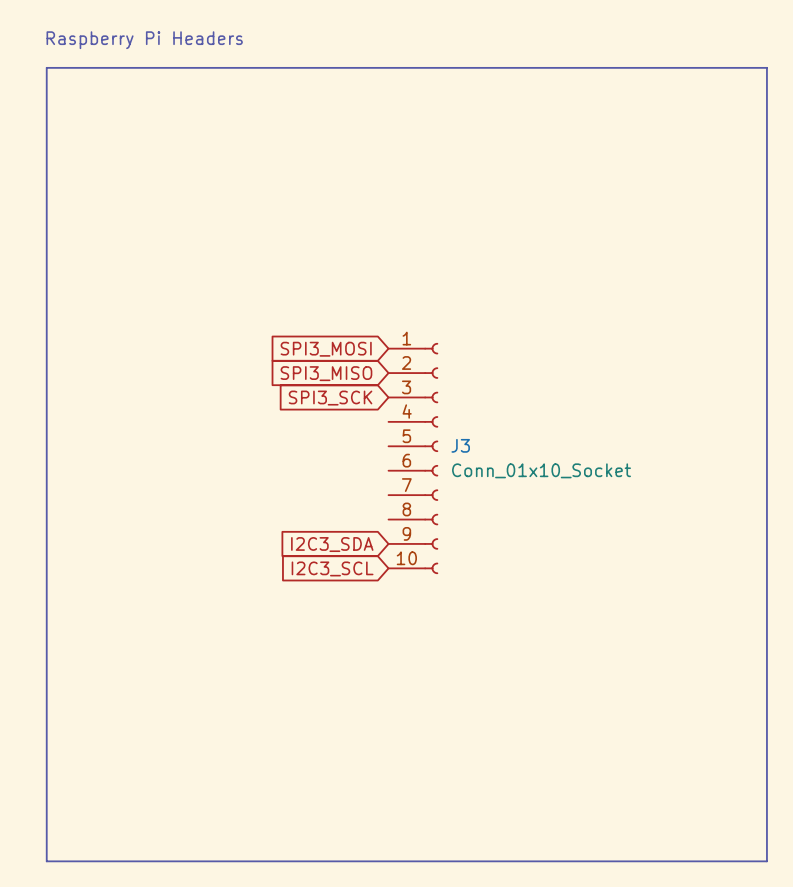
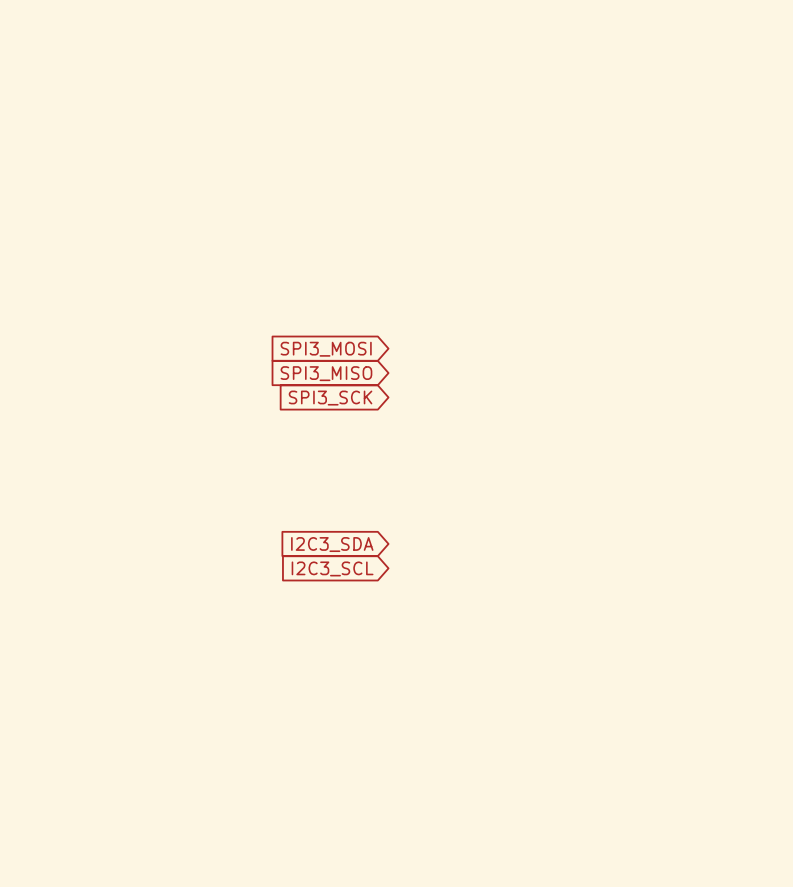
text: Raspberry Pi Headers (144, 40) -> none
line: (46, 67) (766, 67) (766, 861) (46, 861) (46, 67) -> none
J3: Conn_01x10_Socket (413, 458) -> none

